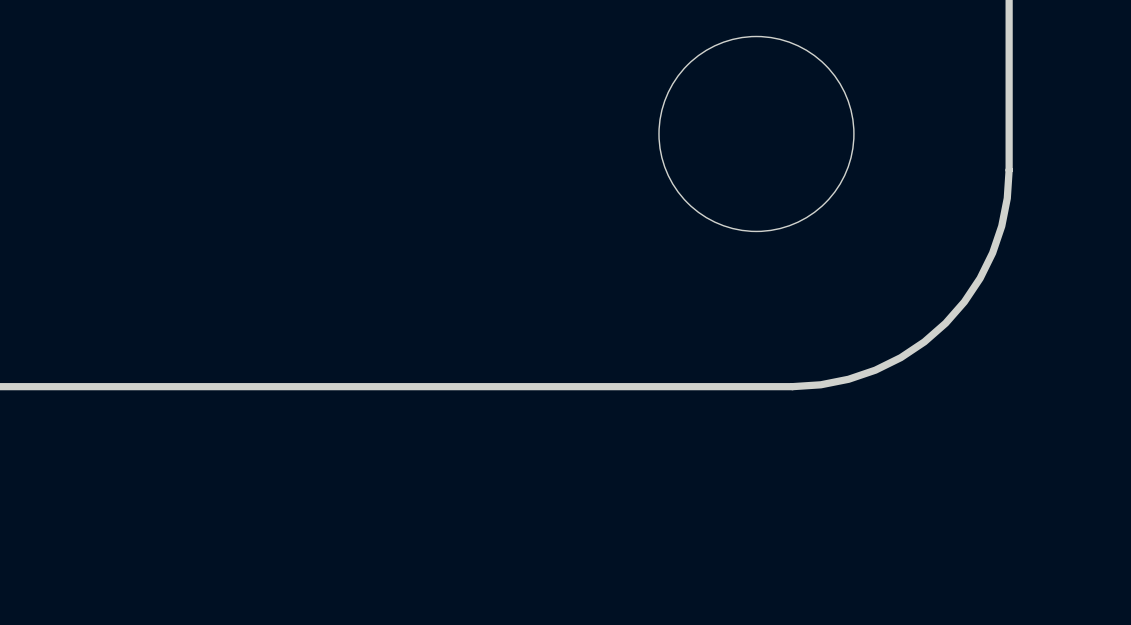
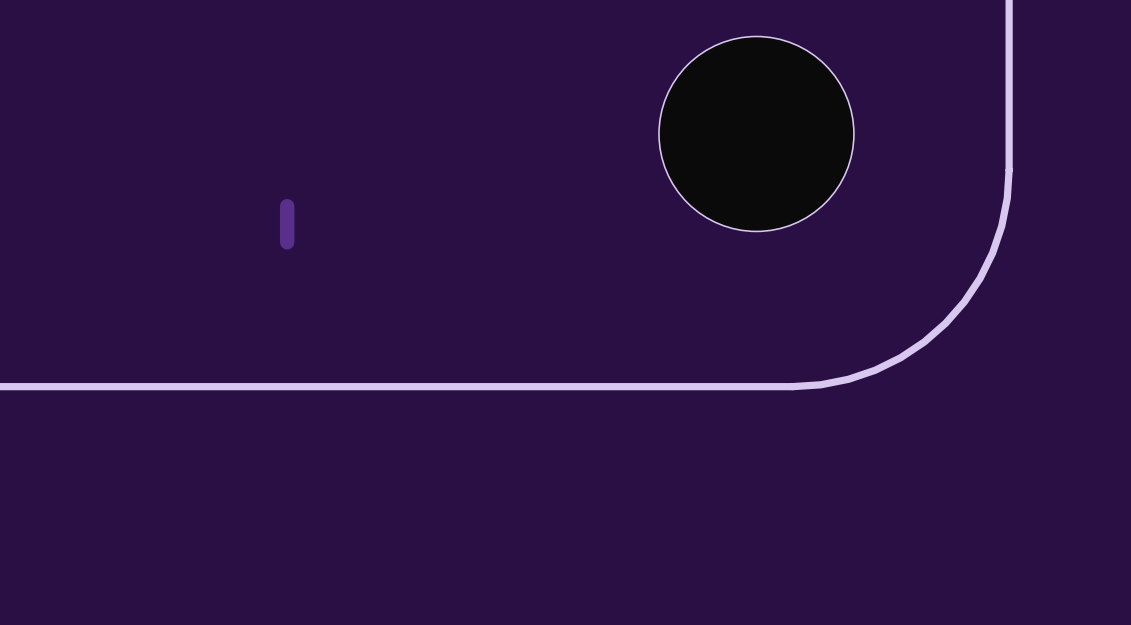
track: none -> (287, 206) (287, 242)

